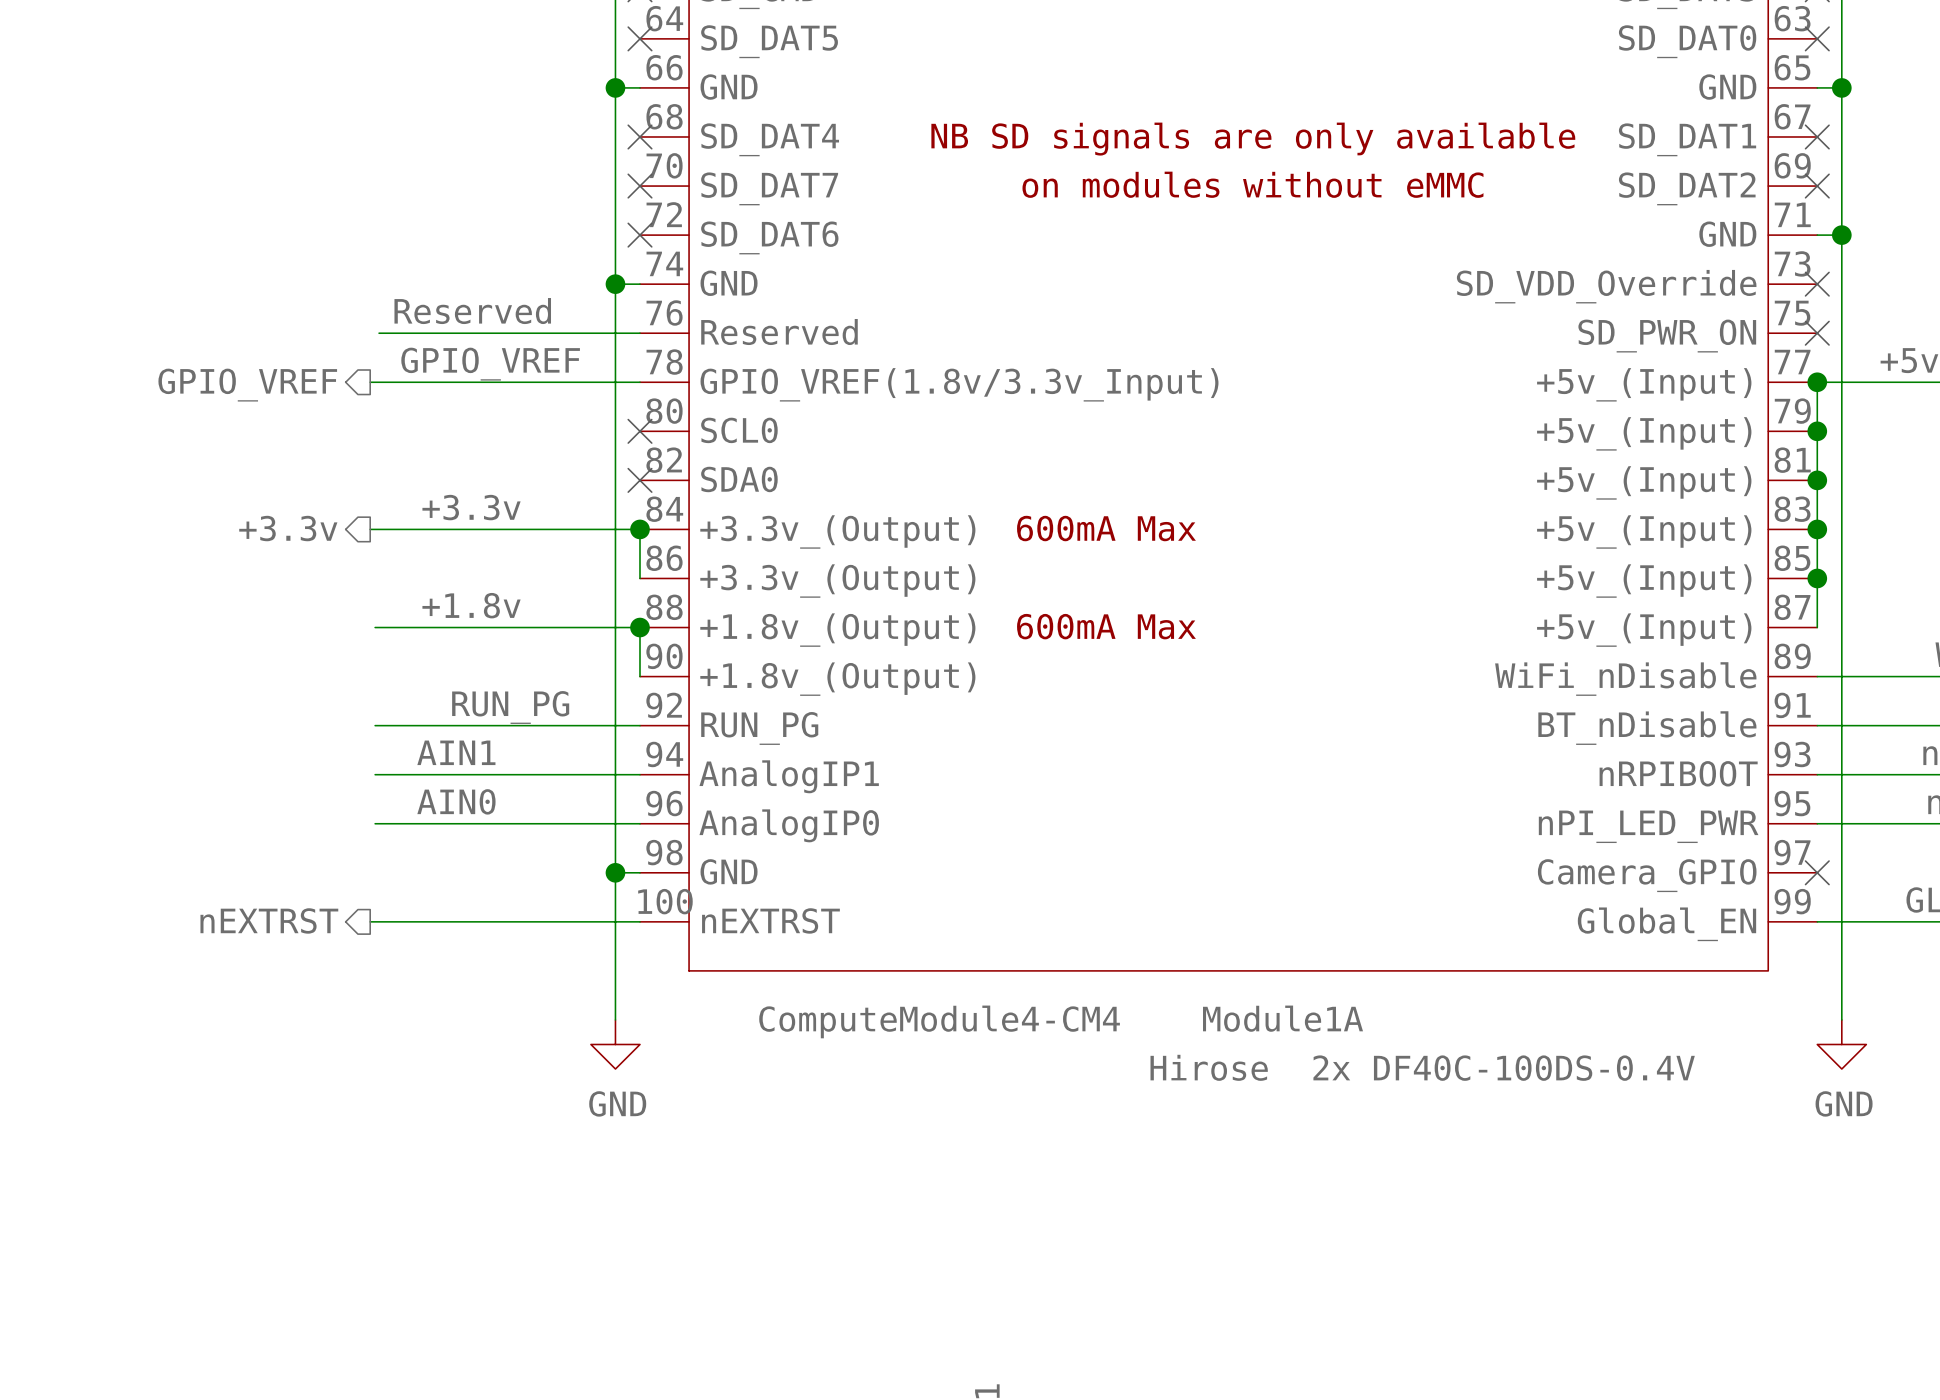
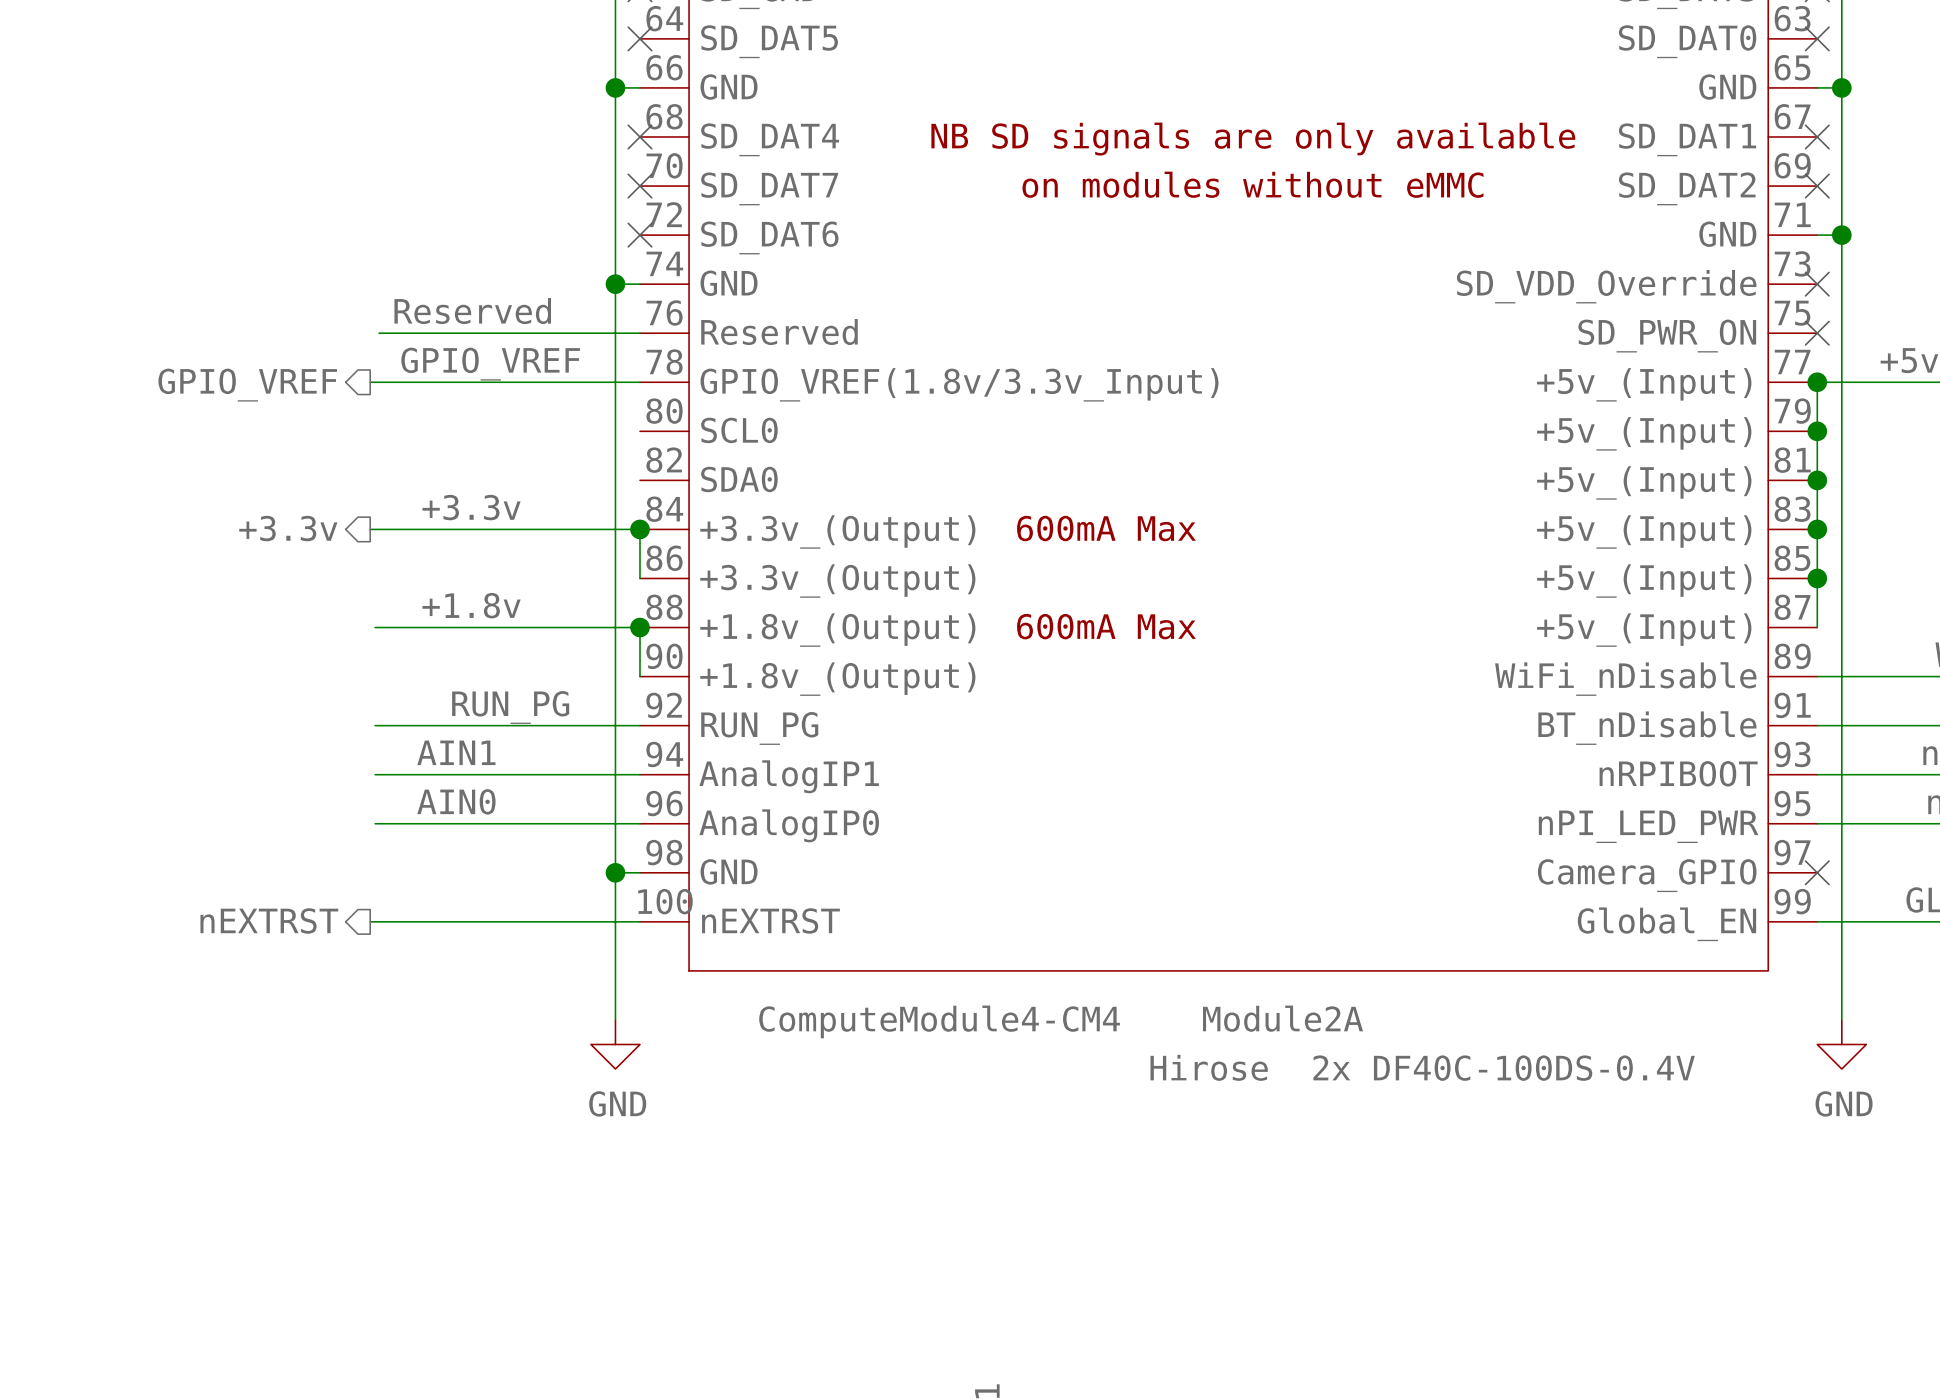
no-connect mark: (639, 431) -> none
no-connect mark: (639, 480) -> none
Module1A name: Module1A (1283, 1018) -> Module2A (1283, 1018)

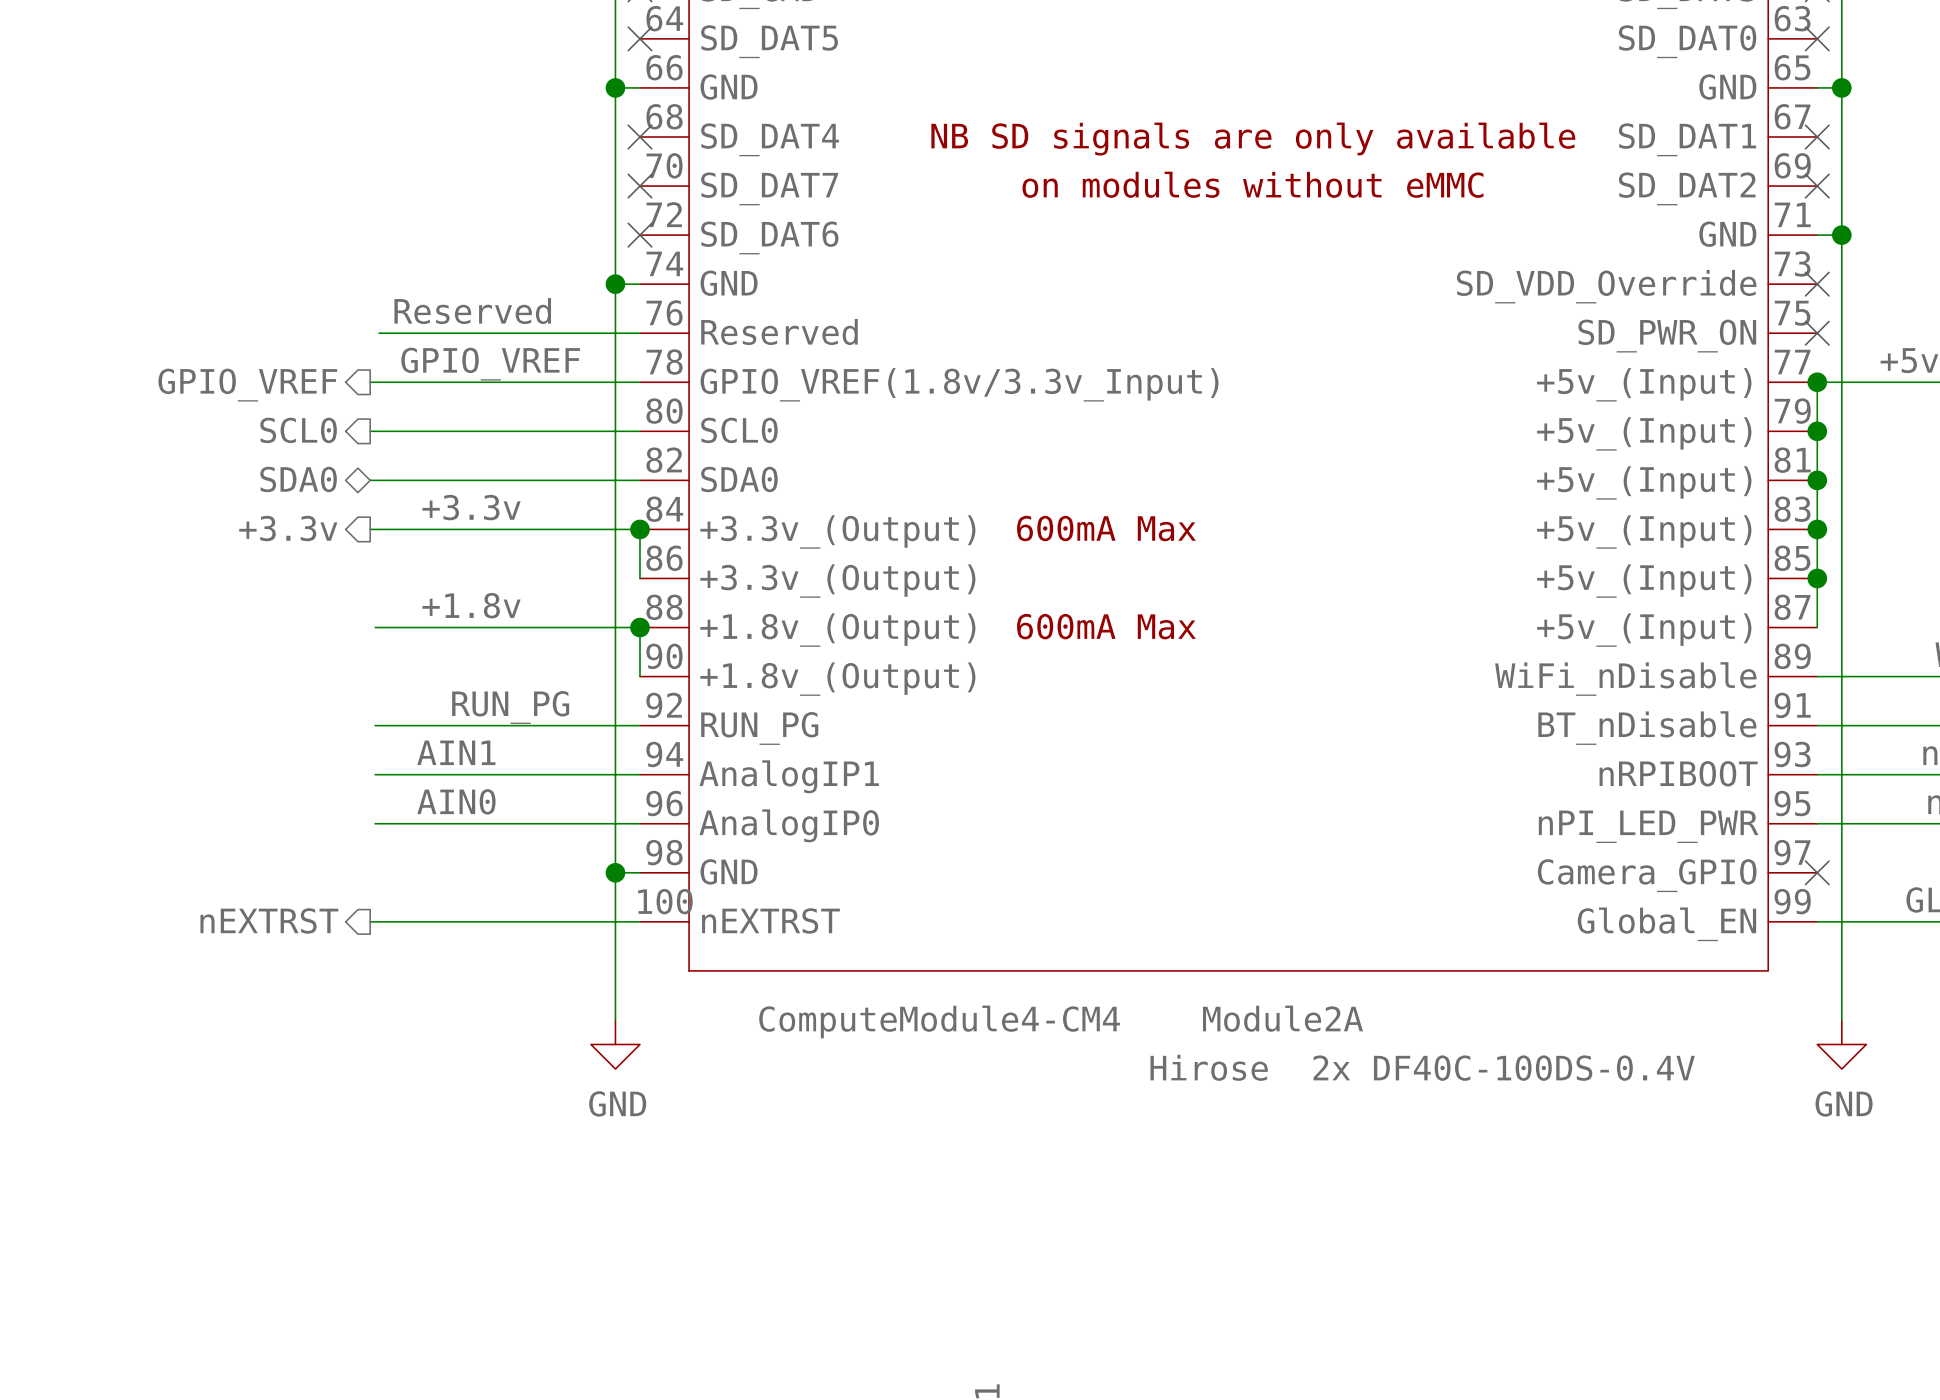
hierarchical label: none -> SCL0 (298, 430)
wire: none -> (370, 431) (639, 431)
hierarchical label: none -> SDA0 (298, 479)
wire: none -> (370, 480) (639, 480)

